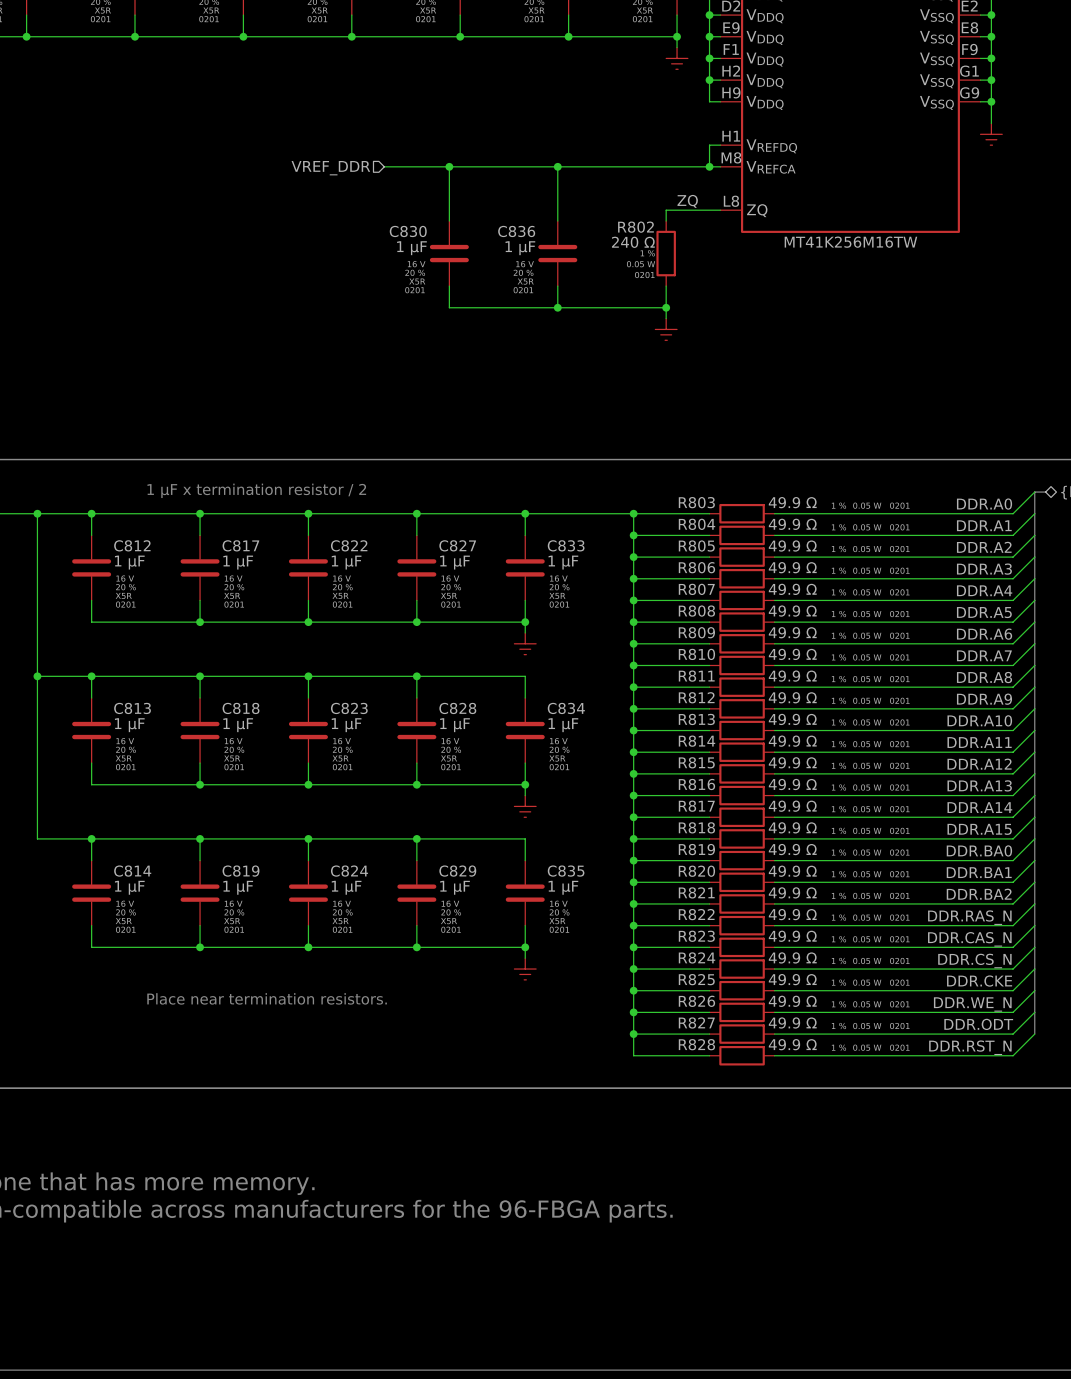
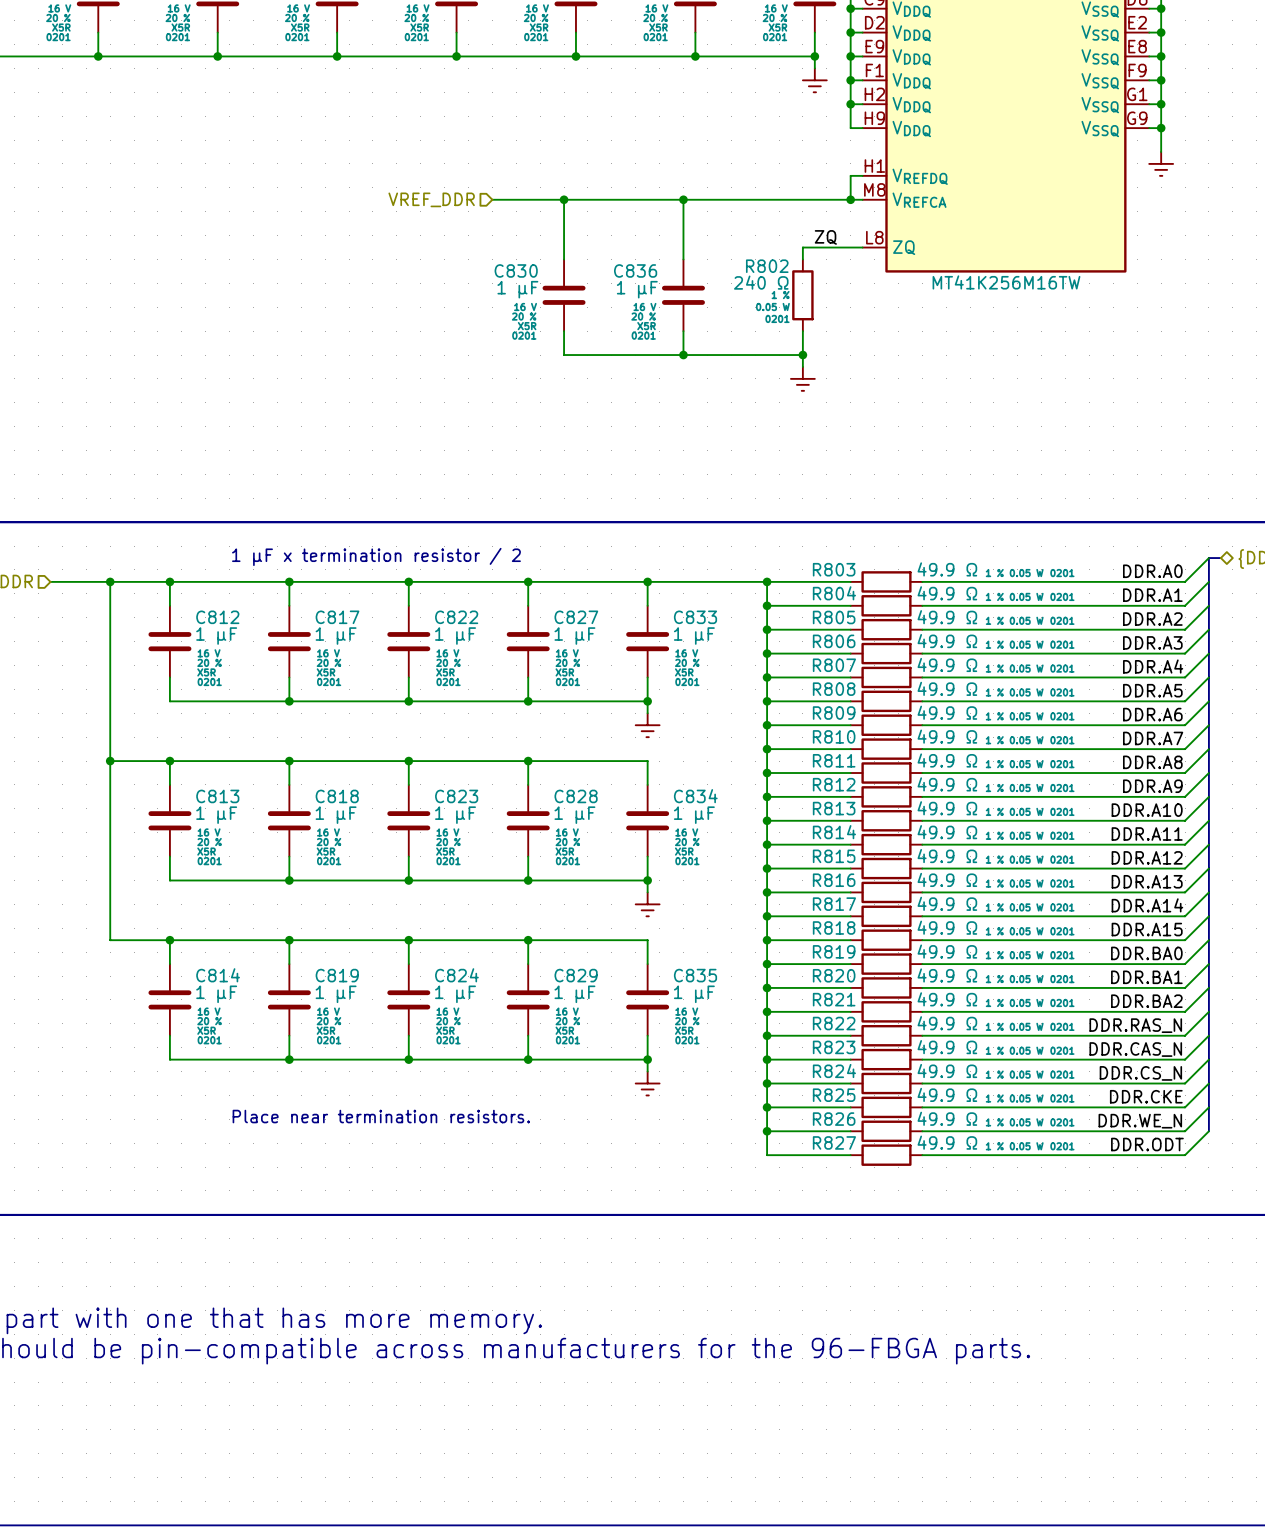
bus: (1034, 1012) (1034, 1034) -> none
wire: (633, 1034) (633, 1055) (709, 1055) -> none
junction: (633, 1034) -> none
wire: (1034, 1034) (1013, 1055) (774, 1055) -> none
label: DDR.RST_N (970, 1047) -> none
R828: 49.9 Ω (742, 1055) -> none

